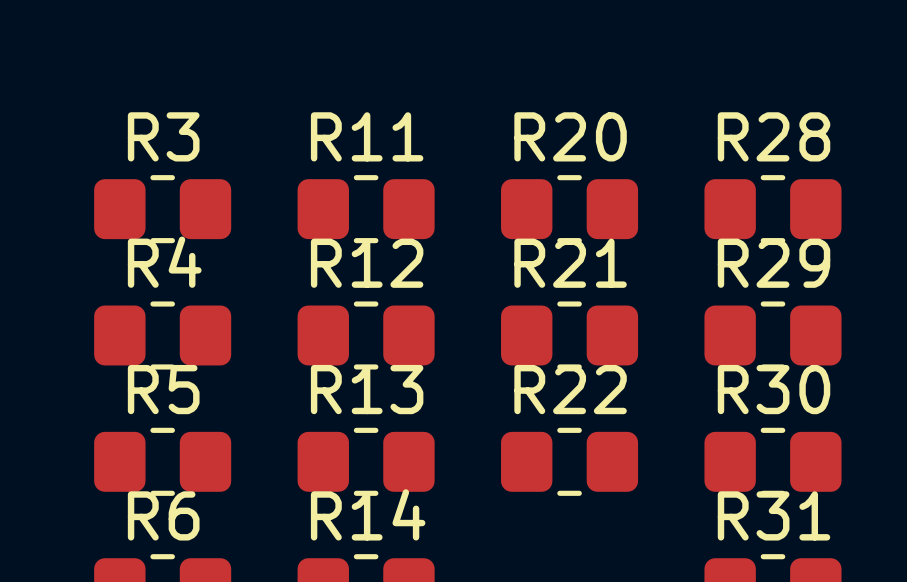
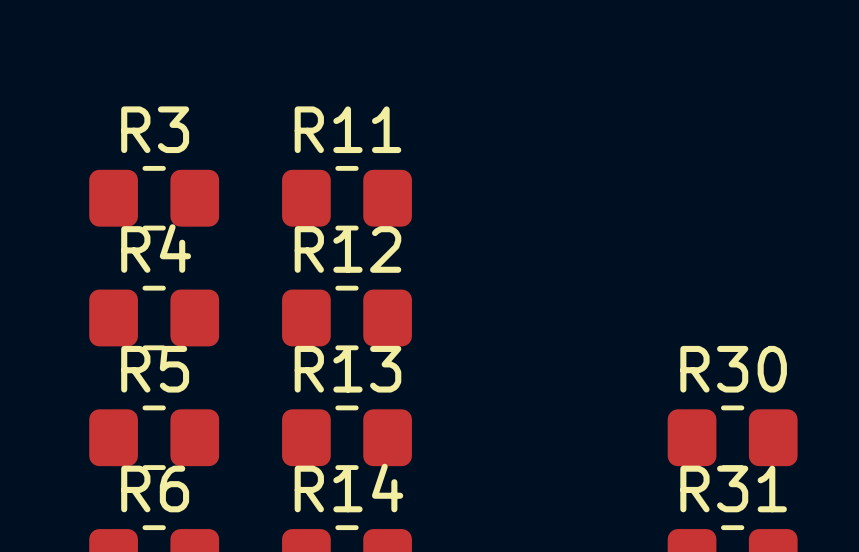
R20: (569, 209) -> none
R28: (772, 209) -> none
R21: (569, 335) -> none
R29: (772, 335) -> none
R22: (569, 461) -> none

